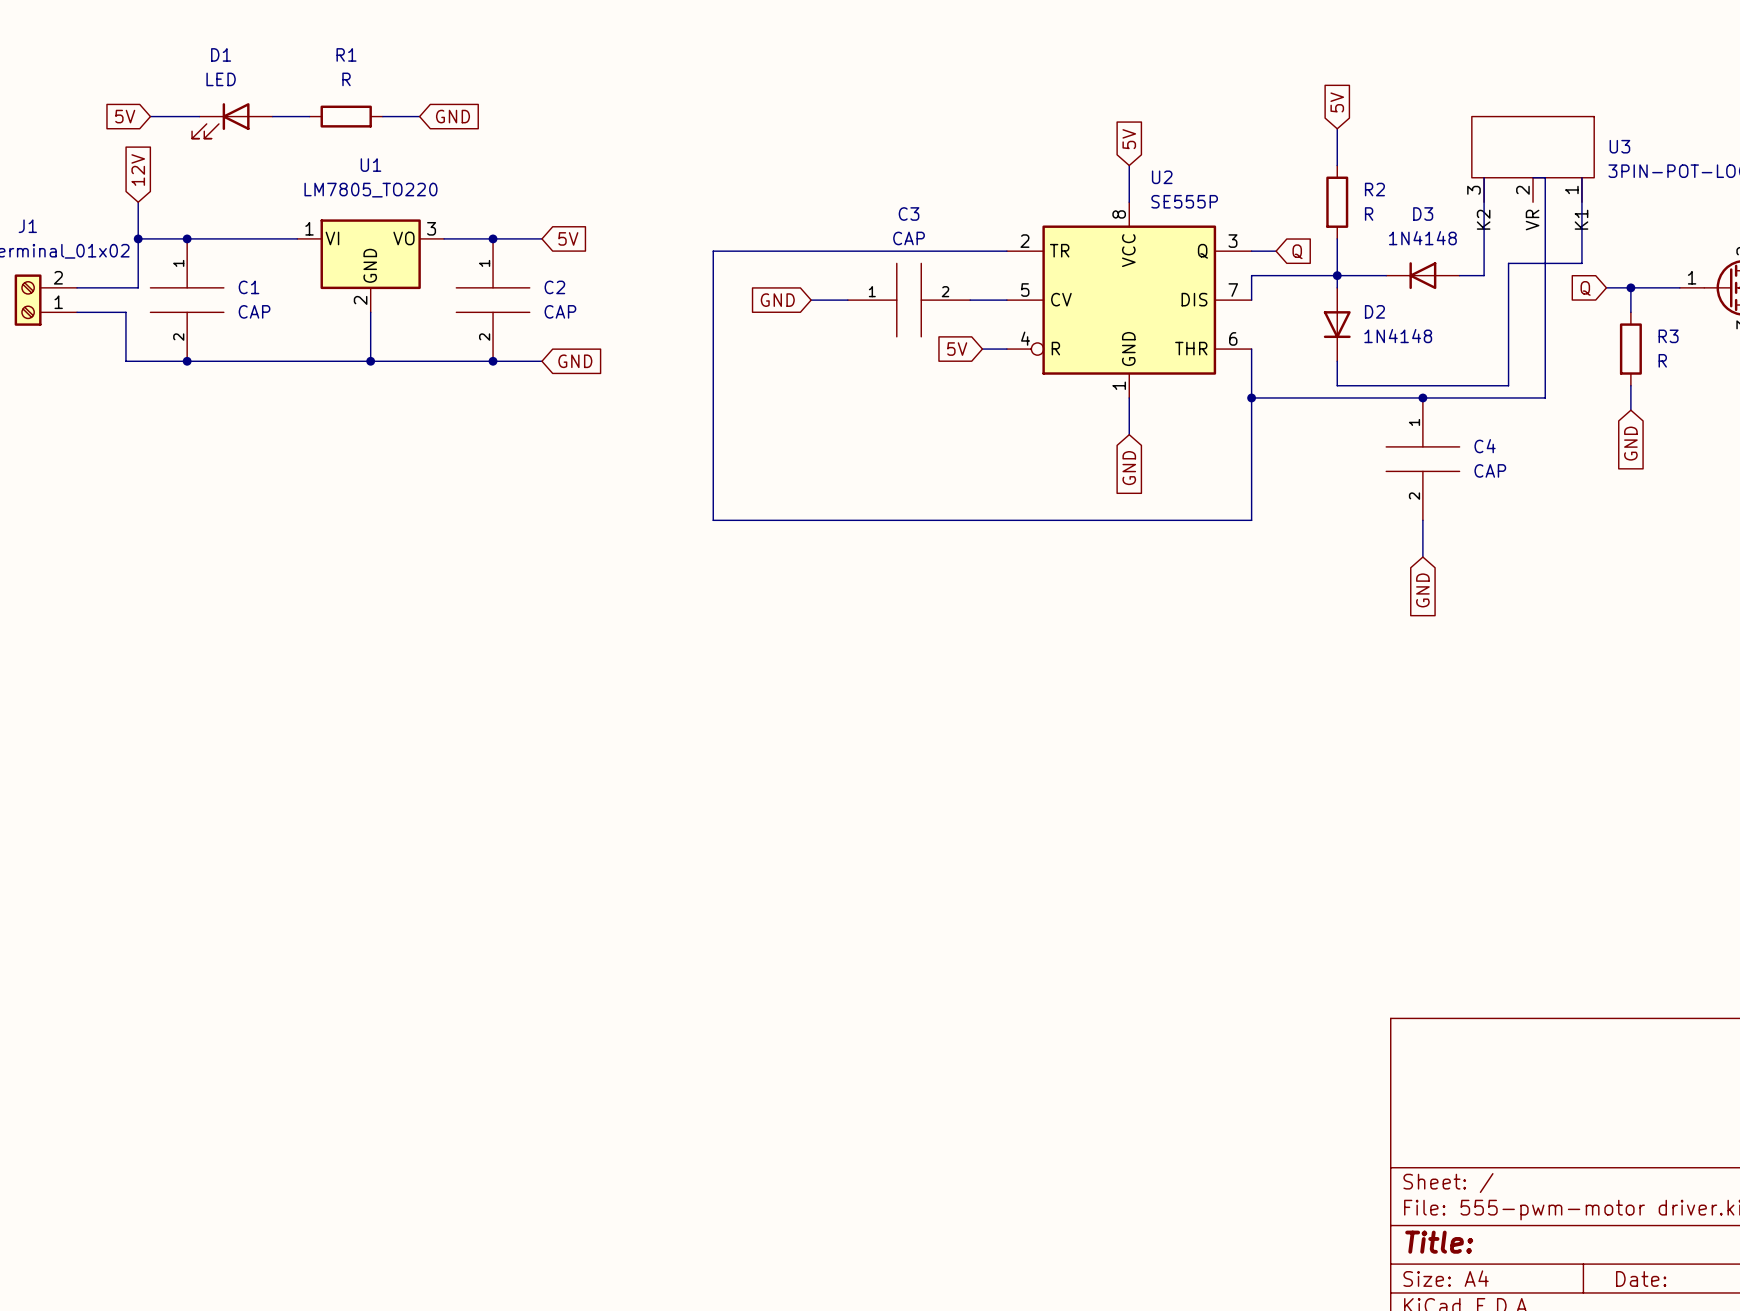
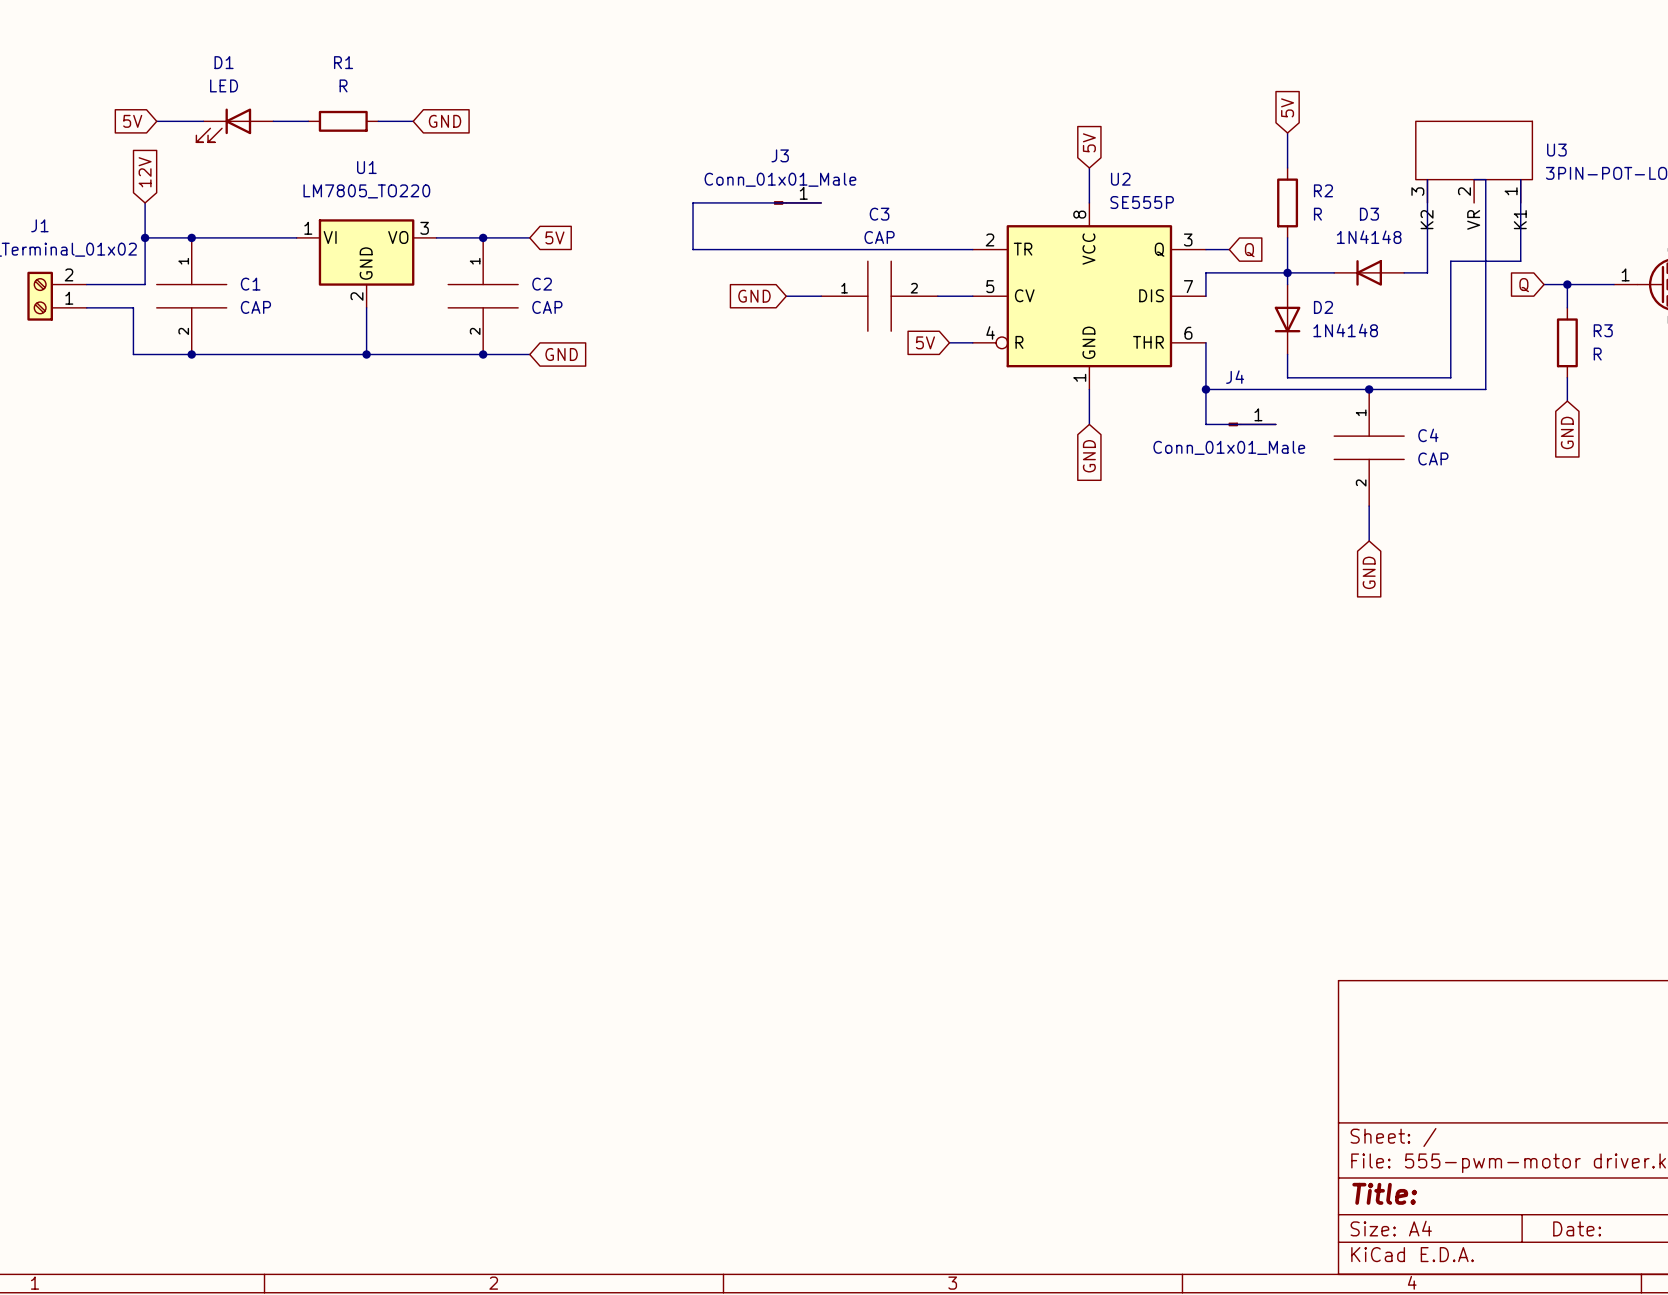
J3: none -> Conn_01x01_Male (797, 202)
wire: (713, 251) (713, 520) (1251, 520) (1251, 434) -> (693, 249) (693, 202) (821, 202)
wire: none -> (1205, 424) (1275, 424)
J4: none -> Conn_01x01_Male (1252, 424)

